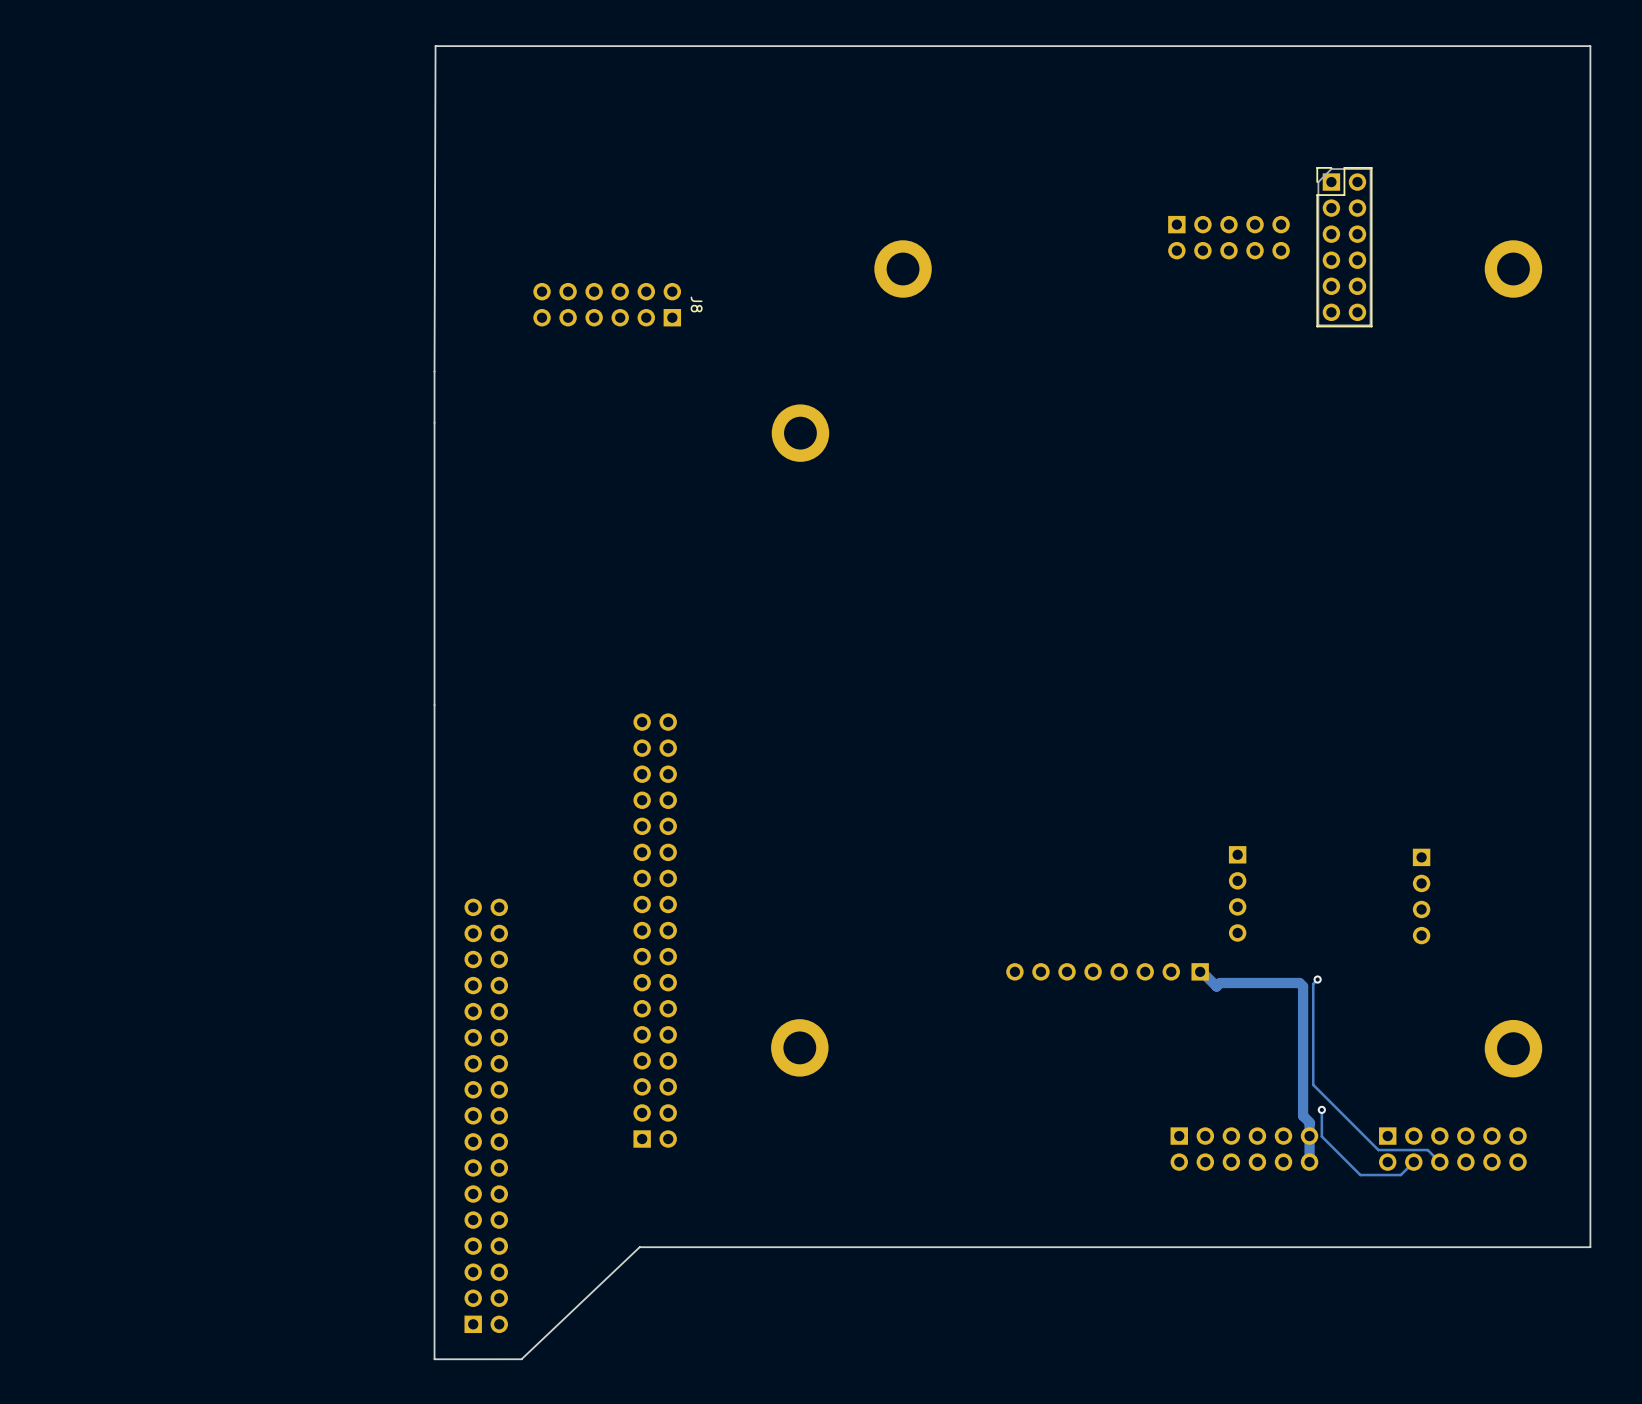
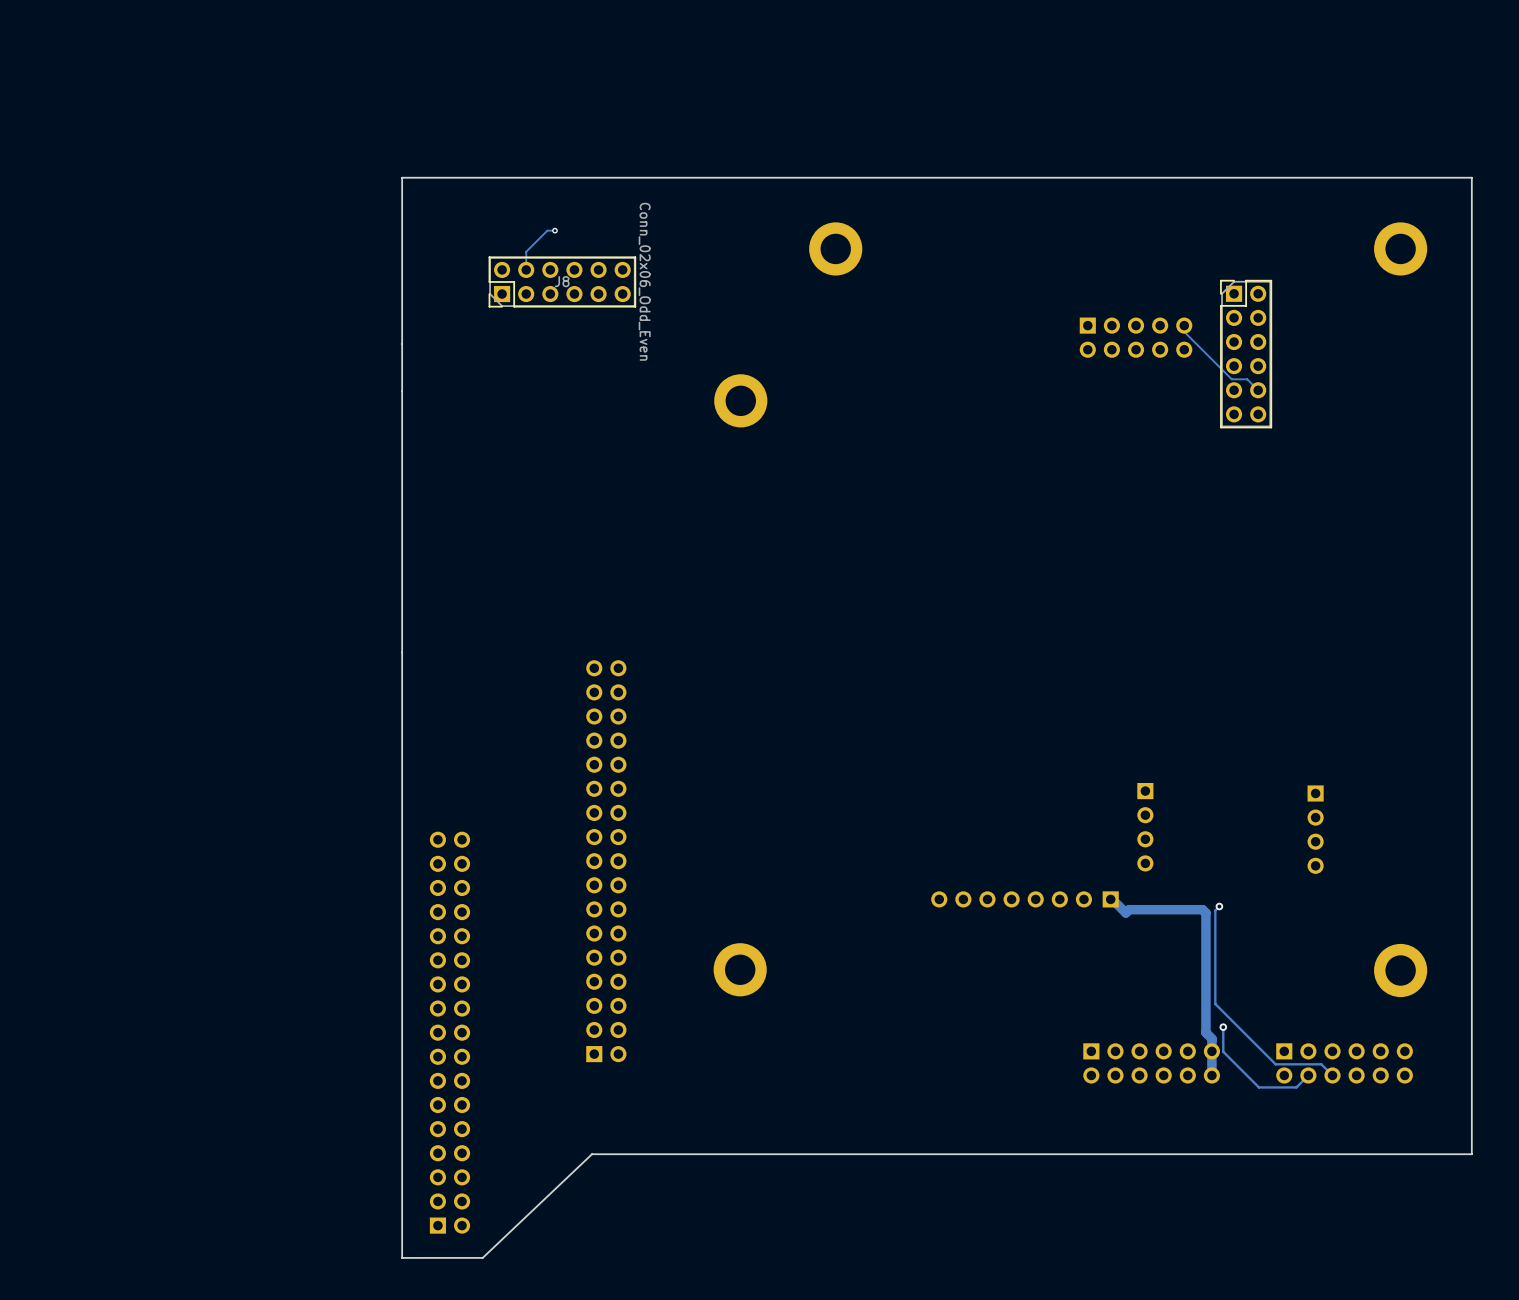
board edge: (1590, 192) (1590, 46) (435, 46) (434, 371) -> (1471, 177) (402, 177) (402, 343)
part position: (1228, 237) -> (1136, 337)
part position: (1344, 247) -> (1246, 354)
track: none -> (554, 230) (547, 230) (526, 251) (526, 269)
via: none -> (554, 230)
J8 side: top (607, 304) -> bottom (562, 281)
track: none -> (1184, 331) (1231, 379) (1247, 379) (1258, 390)

